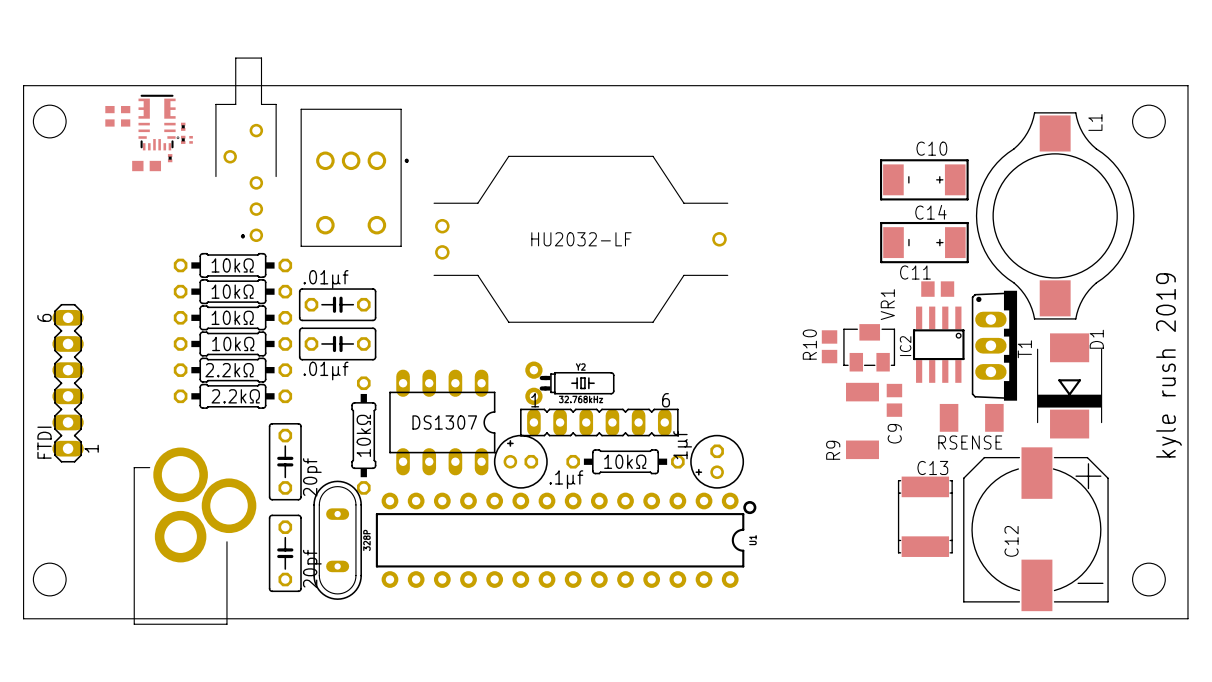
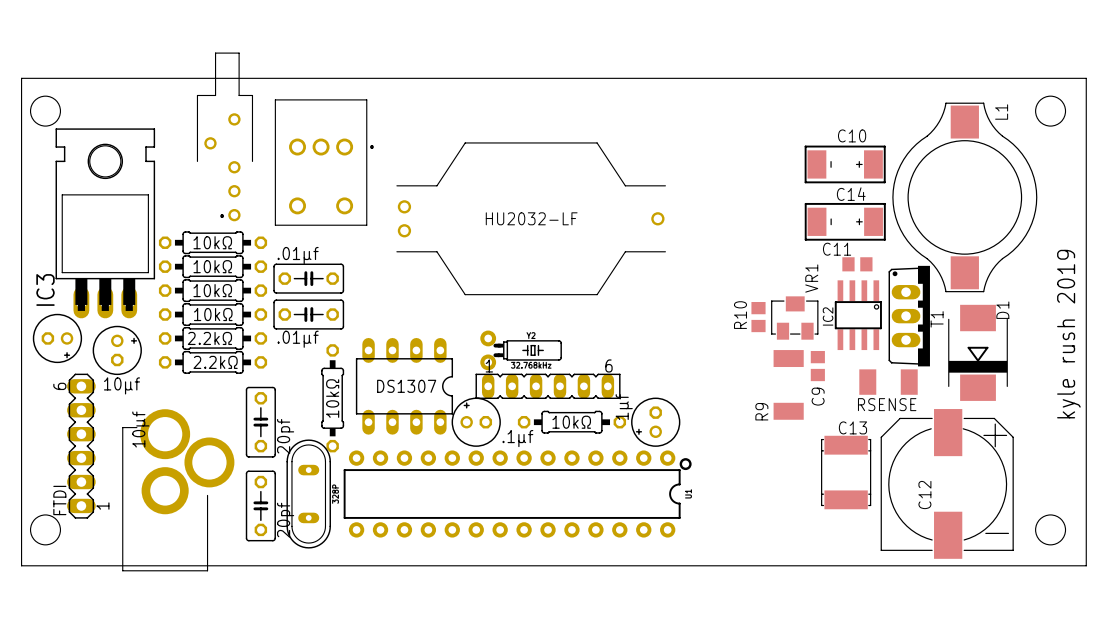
part: (109, 116) -> none
part: (125, 116) -> none
part: (158, 122) -> none
part: (183, 126) -> none
part: (183, 139) -> none
part: (191, 139) -> none
part: (170, 158) -> none
part: (146, 166) -> none
IC3: none -> (105, 223)
part: none -> 10μf (57, 338)
FTDI position: (68, 383) -> (81, 446)
part: none -> 10μf (117, 350)

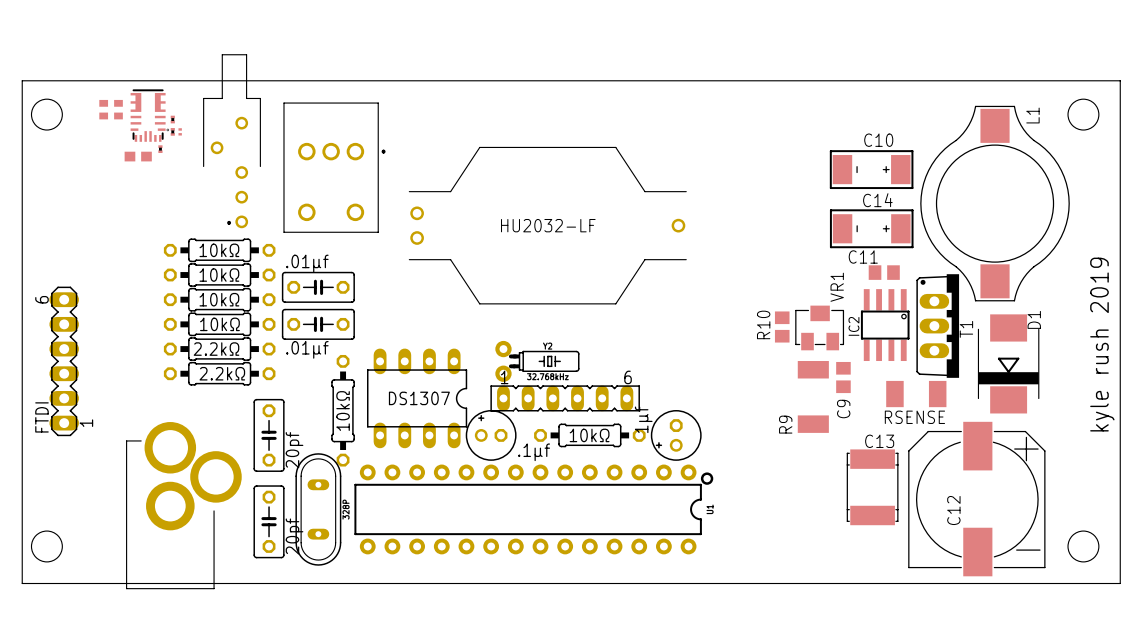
part: none -> (103, 109)
part: none -> (118, 109)
part: none -> (149, 115)
part: none -> (172, 119)
part: none -> (172, 131)
part: none -> (180, 131)
part: none -> (160, 149)
part: none -> (138, 156)
IC3: (105, 223) -> none
part: 10μf (57, 338) -> none
part: 10μf (117, 350) -> none
FTDI position: (81, 446) -> (64, 361)

